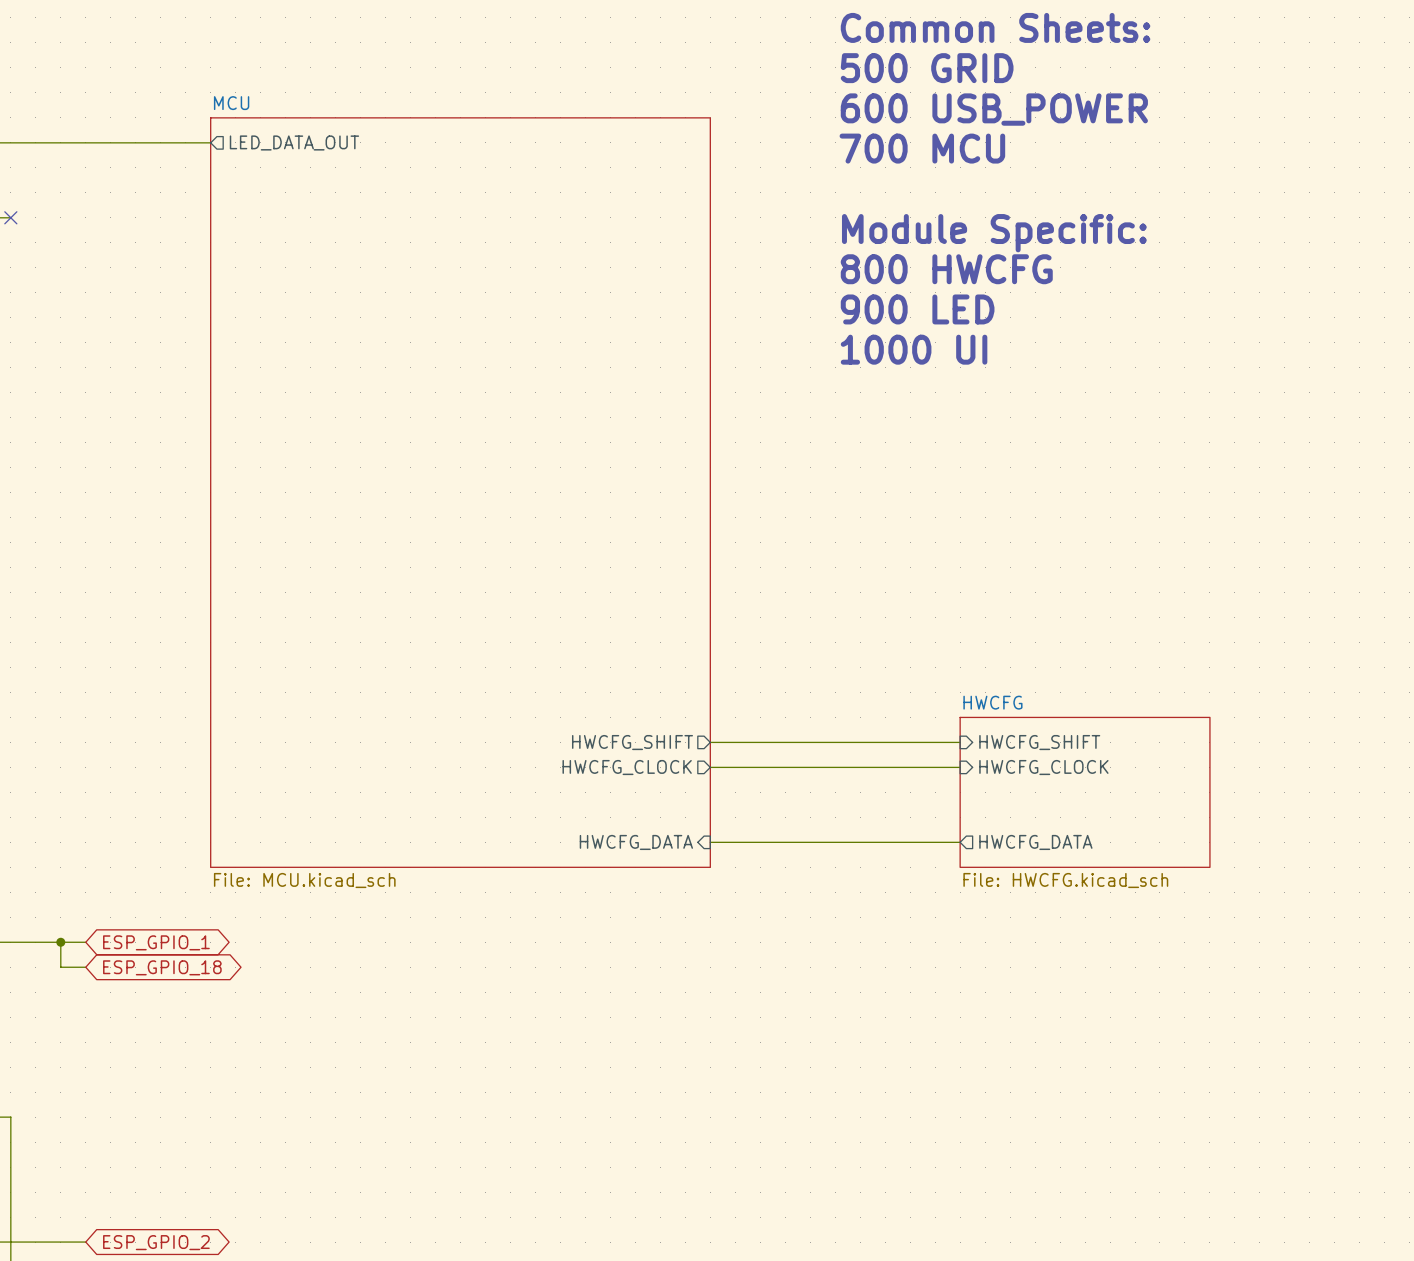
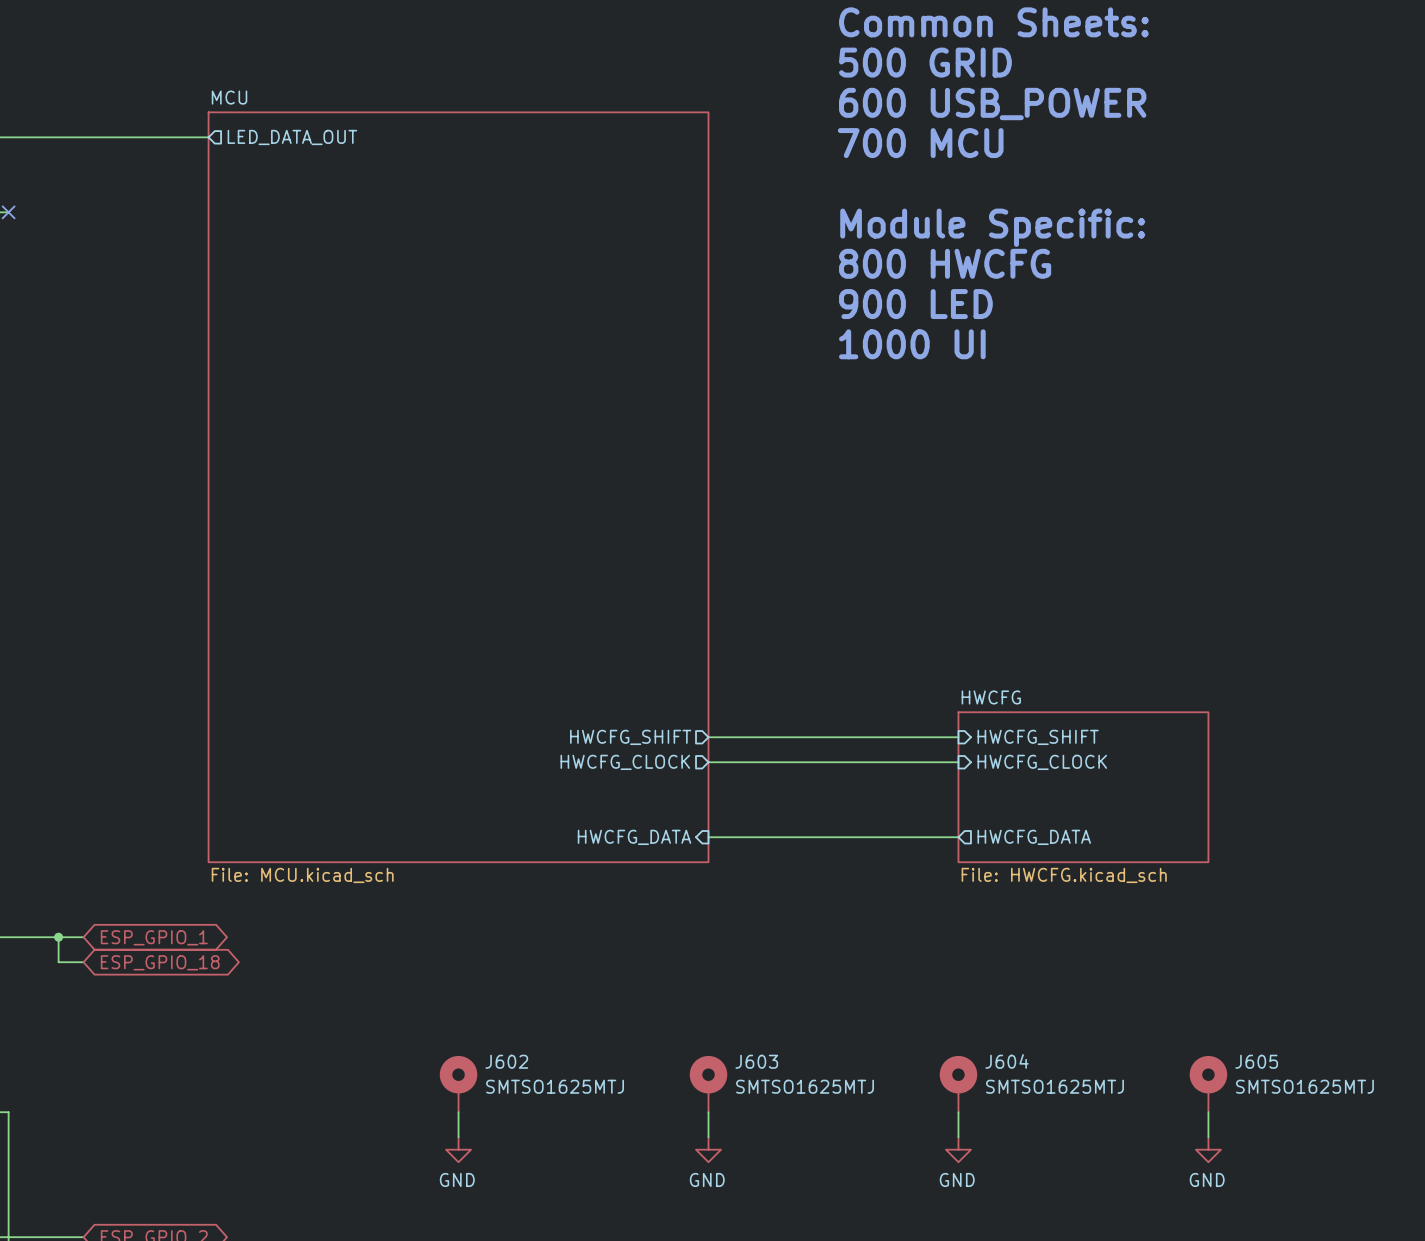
J602: none -> SMTSO1625MTJ (458, 1084)
J603: none -> SMTSO1625MTJ (708, 1084)
J604: none -> SMTSO1625MTJ (958, 1084)
J605: none -> SMTSO1625MTJ (1208, 1084)
wire: none -> (458, 1112) (458, 1137)
wire: none -> (708, 1112) (708, 1137)
wire: none -> (958, 1112) (958, 1137)
wire: none -> (1208, 1112) (1208, 1137)
power symbol: none -> GND (458, 1149)
power symbol: none -> GND (708, 1149)
power symbol: none -> GND (958, 1149)
power symbol: none -> GND (1208, 1149)

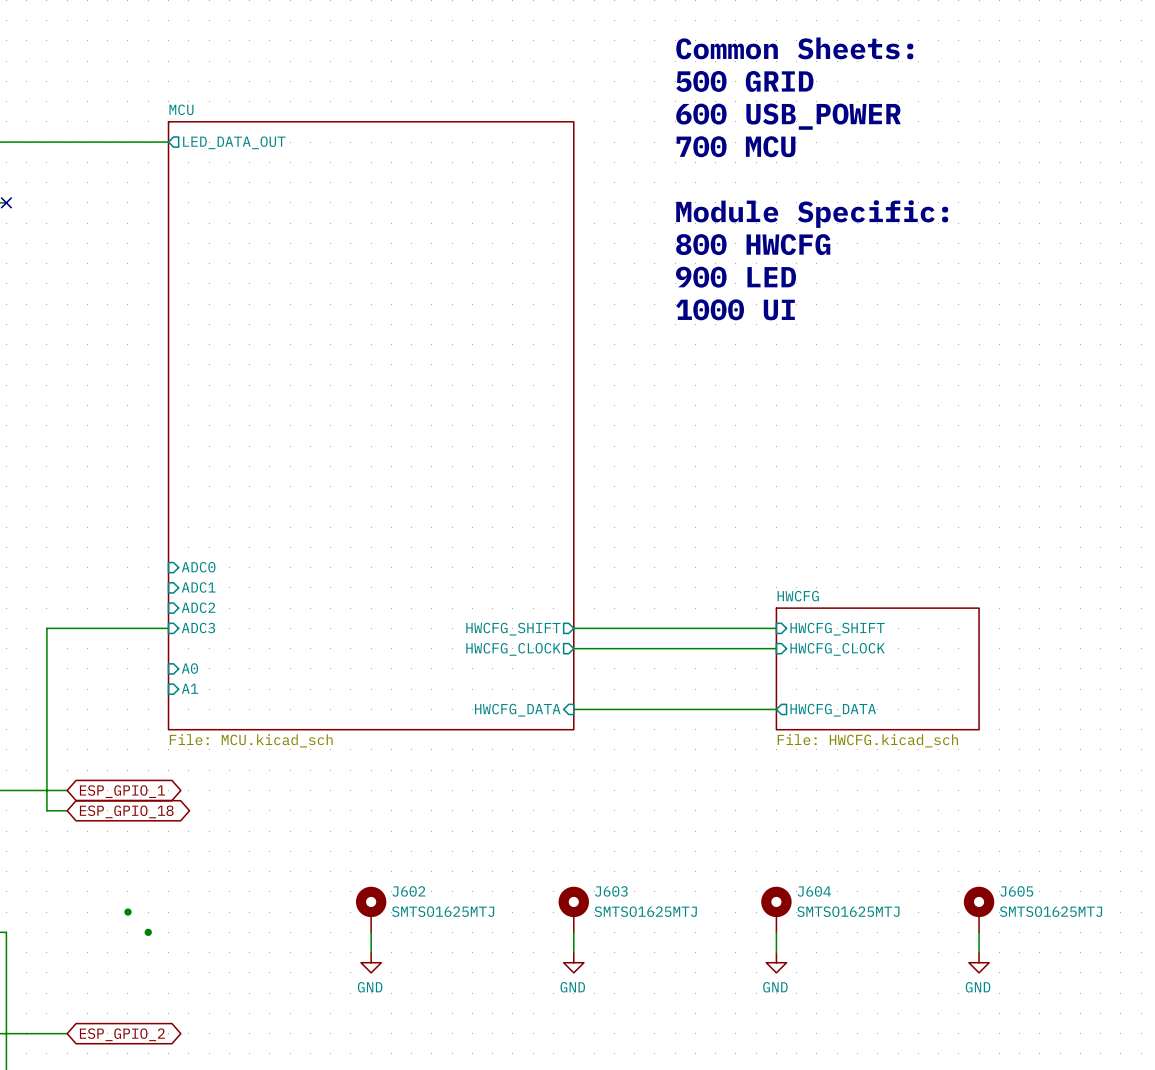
sheet pin: none -> ADC0 (198, 567)
sheet pin: none -> ADC1 (198, 587)
sheet pin: none -> ADC2 (198, 607)
sheet pin: none -> ADC3 (198, 628)
wire: none -> (168, 628) (46, 628) (46, 790)
sheet pin: none -> A0 (189, 668)
sheet pin: none -> A1 (189, 688)
junction: (58, 937) -> none
junction: none -> (127, 912)
junction: none -> (148, 932)

